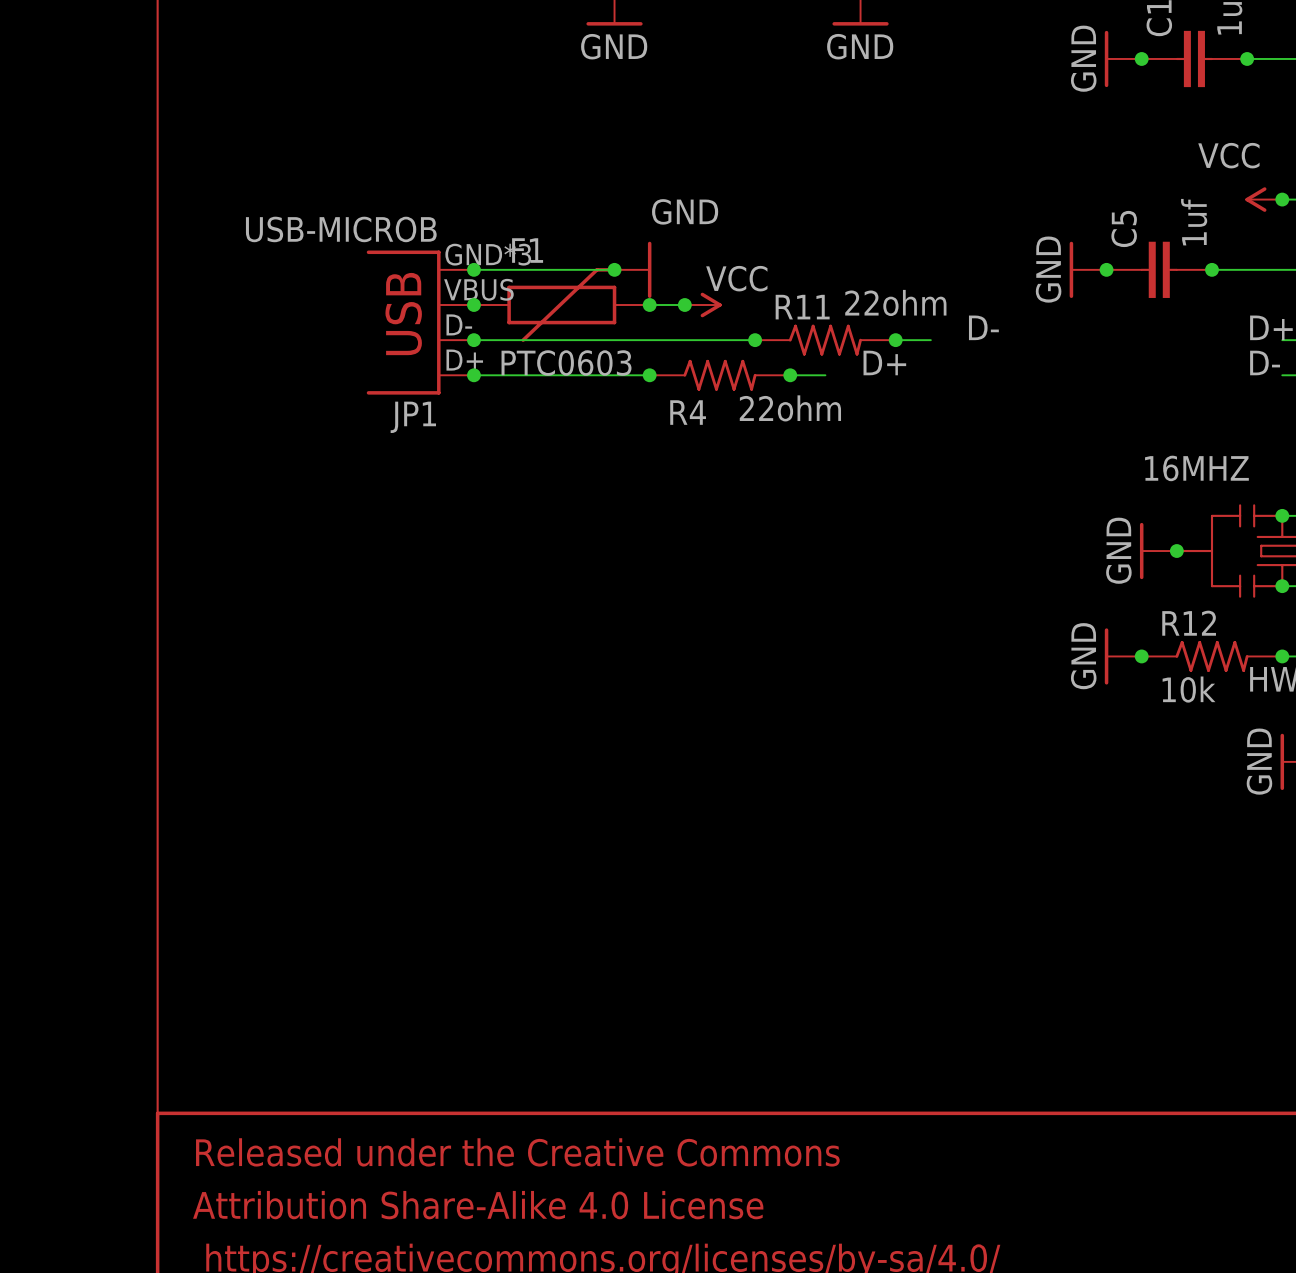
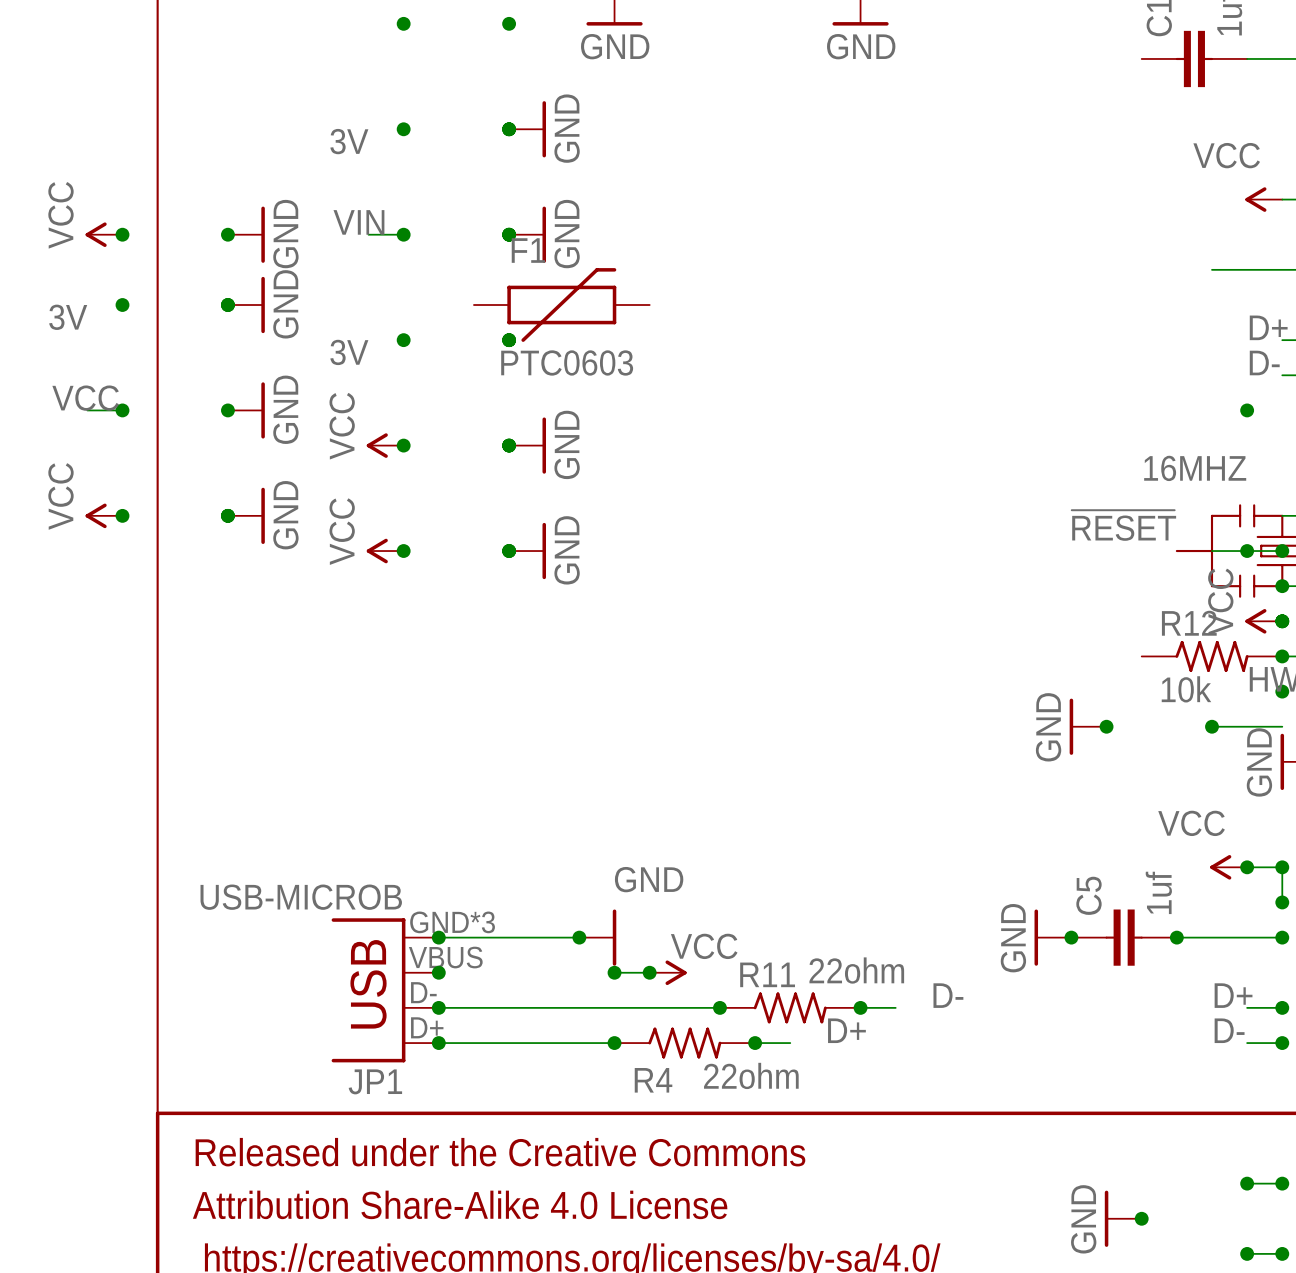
junction: none -> (403, 23)
junction: none -> (509, 23)
power symbol: GND (1123, 58) -> none
junction: (1141, 58) -> none
junction: (1247, 58) -> none
junction: none -> (403, 129)
junction: none -> (509, 129)
power symbol: none -> GND (527, 129)
label: none -> 3V (349, 141)
junction: (1282, 199) -> none
label: none -> VIN (358, 222)
power symbol: none -> VCC (104, 234)
junction: none -> (122, 234)
junction: none -> (227, 234)
power symbol: none -> GND (246, 234)
junction: none -> (403, 234)
junction: none -> (509, 234)
power symbol: none -> GND (527, 234)
wire: (473, 269) (614, 269) -> none
junction: (473, 269) -> none
junction: (614, 269) -> none
power symbol: GND (632, 269) -> none
power symbol: GND (1088, 269) -> none
junction: (1106, 269) -> none
C5 position: (1159, 269) -> (1124, 937)
junction: (1212, 269) -> none
junction: none -> (122, 305)
junction: none -> (227, 305)
power symbol: none -> GND (246, 305)
junction: (473, 305) -> none
wire: (649, 305) (684, 305) -> (368, 234) (403, 234)
junction: (649, 305) -> none
junction: (684, 305) -> none
power symbol: VCC (703, 305) -> none
label: none -> 3V (68, 317)
JP1 position: (420, 322) -> (385, 990)
label: D- (983, 327) -> none
junction: none -> (403, 340)
wire: (473, 340) (755, 340) -> none
junction: (473, 340) -> none
junction: none -> (509, 340)
junction: (755, 340) -> none
R11 position: (825, 340) -> (790, 1007)
wire: (895, 340) (930, 340) -> none
junction: (895, 340) -> none
label: none -> 3V (349, 352)
label: D+ (884, 362) -> none
wire: (473, 375) (649, 375) -> none
junction: (473, 375) -> none
junction: (649, 375) -> none
R4 position: (719, 375) -> (684, 1043)
wire: (790, 375) (825, 375) -> none
junction: (790, 375) -> none
label: none -> VCC (85, 398)
wire: none -> (87, 410) (122, 410)
junction: none -> (122, 410)
junction: none -> (227, 410)
power symbol: none -> GND (246, 410)
junction: none -> (1247, 410)
power symbol: none -> VCC (385, 445)
junction: none -> (403, 445)
junction: none -> (509, 445)
power symbol: none -> GND (527, 445)
power symbol: none -> VCC (104, 515)
junction: none -> (122, 515)
junction: none -> (227, 515)
power symbol: none -> GND (246, 515)
junction: (1282, 515) -> none
label: none -> ~{RESET} (1123, 525)
power symbol: none -> VCC (385, 551)
junction: none -> (403, 551)
junction: none -> (509, 551)
power symbol: none -> GND (527, 551)
power symbol: GND (1158, 551) -> none
junction: (1176, 551) -> none
wire: none -> (1212, 551) (1282, 551)
junction: none -> (1247, 551)
junction: none -> (1282, 551)
power symbol: none -> VCC (1263, 621)
junction: none -> (1282, 621)
power symbol position: GND (1123, 656) -> GND (1088, 726)
junction: (1141, 656) -> none
junction: none -> (1282, 691)
junction: none -> (1106, 726)
wire: none -> (1212, 726) (1282, 726)
junction: none -> (1212, 726)
power symbol: none -> VCC (1228, 867)
wire: none -> (1247, 867) (1282, 867) (1282, 902)
junction: none -> (1247, 867)
junction: none -> (1282, 867)
junction: none -> (1282, 902)
wire: none -> (438, 937) (579, 937)
junction: none -> (438, 937)
junction: none -> (579, 937)
power symbol: none -> GND (597, 937)
power symbol: none -> GND (1052, 937)
junction: none -> (1071, 937)
wire: none -> (1176, 937) (1282, 937)
junction: none -> (1176, 937)
junction: none -> (1282, 937)
junction: none -> (438, 972)
wire: none -> (614, 972) (649, 972)
junction: none -> (614, 972)
junction: none -> (649, 972)
power symbol: none -> VCC (668, 972)
label: none -> D- (948, 995)
label: none -> D+ (1233, 995)
wire: none -> (438, 1007) (719, 1007)
junction: none -> (438, 1007)
junction: none -> (719, 1007)
wire: none -> (860, 1007) (895, 1007)
junction: none -> (860, 1007)
wire: none -> (1247, 1007) (1282, 1007)
junction: none -> (1282, 1007)
label: none -> D+ (846, 1030)
label: none -> D- (1229, 1030)
wire: none -> (438, 1043) (614, 1043)
junction: none -> (438, 1043)
junction: none -> (614, 1043)
wire: none -> (755, 1043) (790, 1043)
junction: none -> (755, 1043)
wire: none -> (1247, 1043) (1282, 1043)
junction: none -> (1282, 1043)
wire: none -> (1247, 1183) (1282, 1183)
junction: none -> (1247, 1183)
junction: none -> (1282, 1183)
power symbol: none -> GND (1123, 1218)
junction: none -> (1141, 1218)
wire: none -> (1247, 1253) (1282, 1253)
junction: none -> (1247, 1253)
junction: none -> (1282, 1253)

